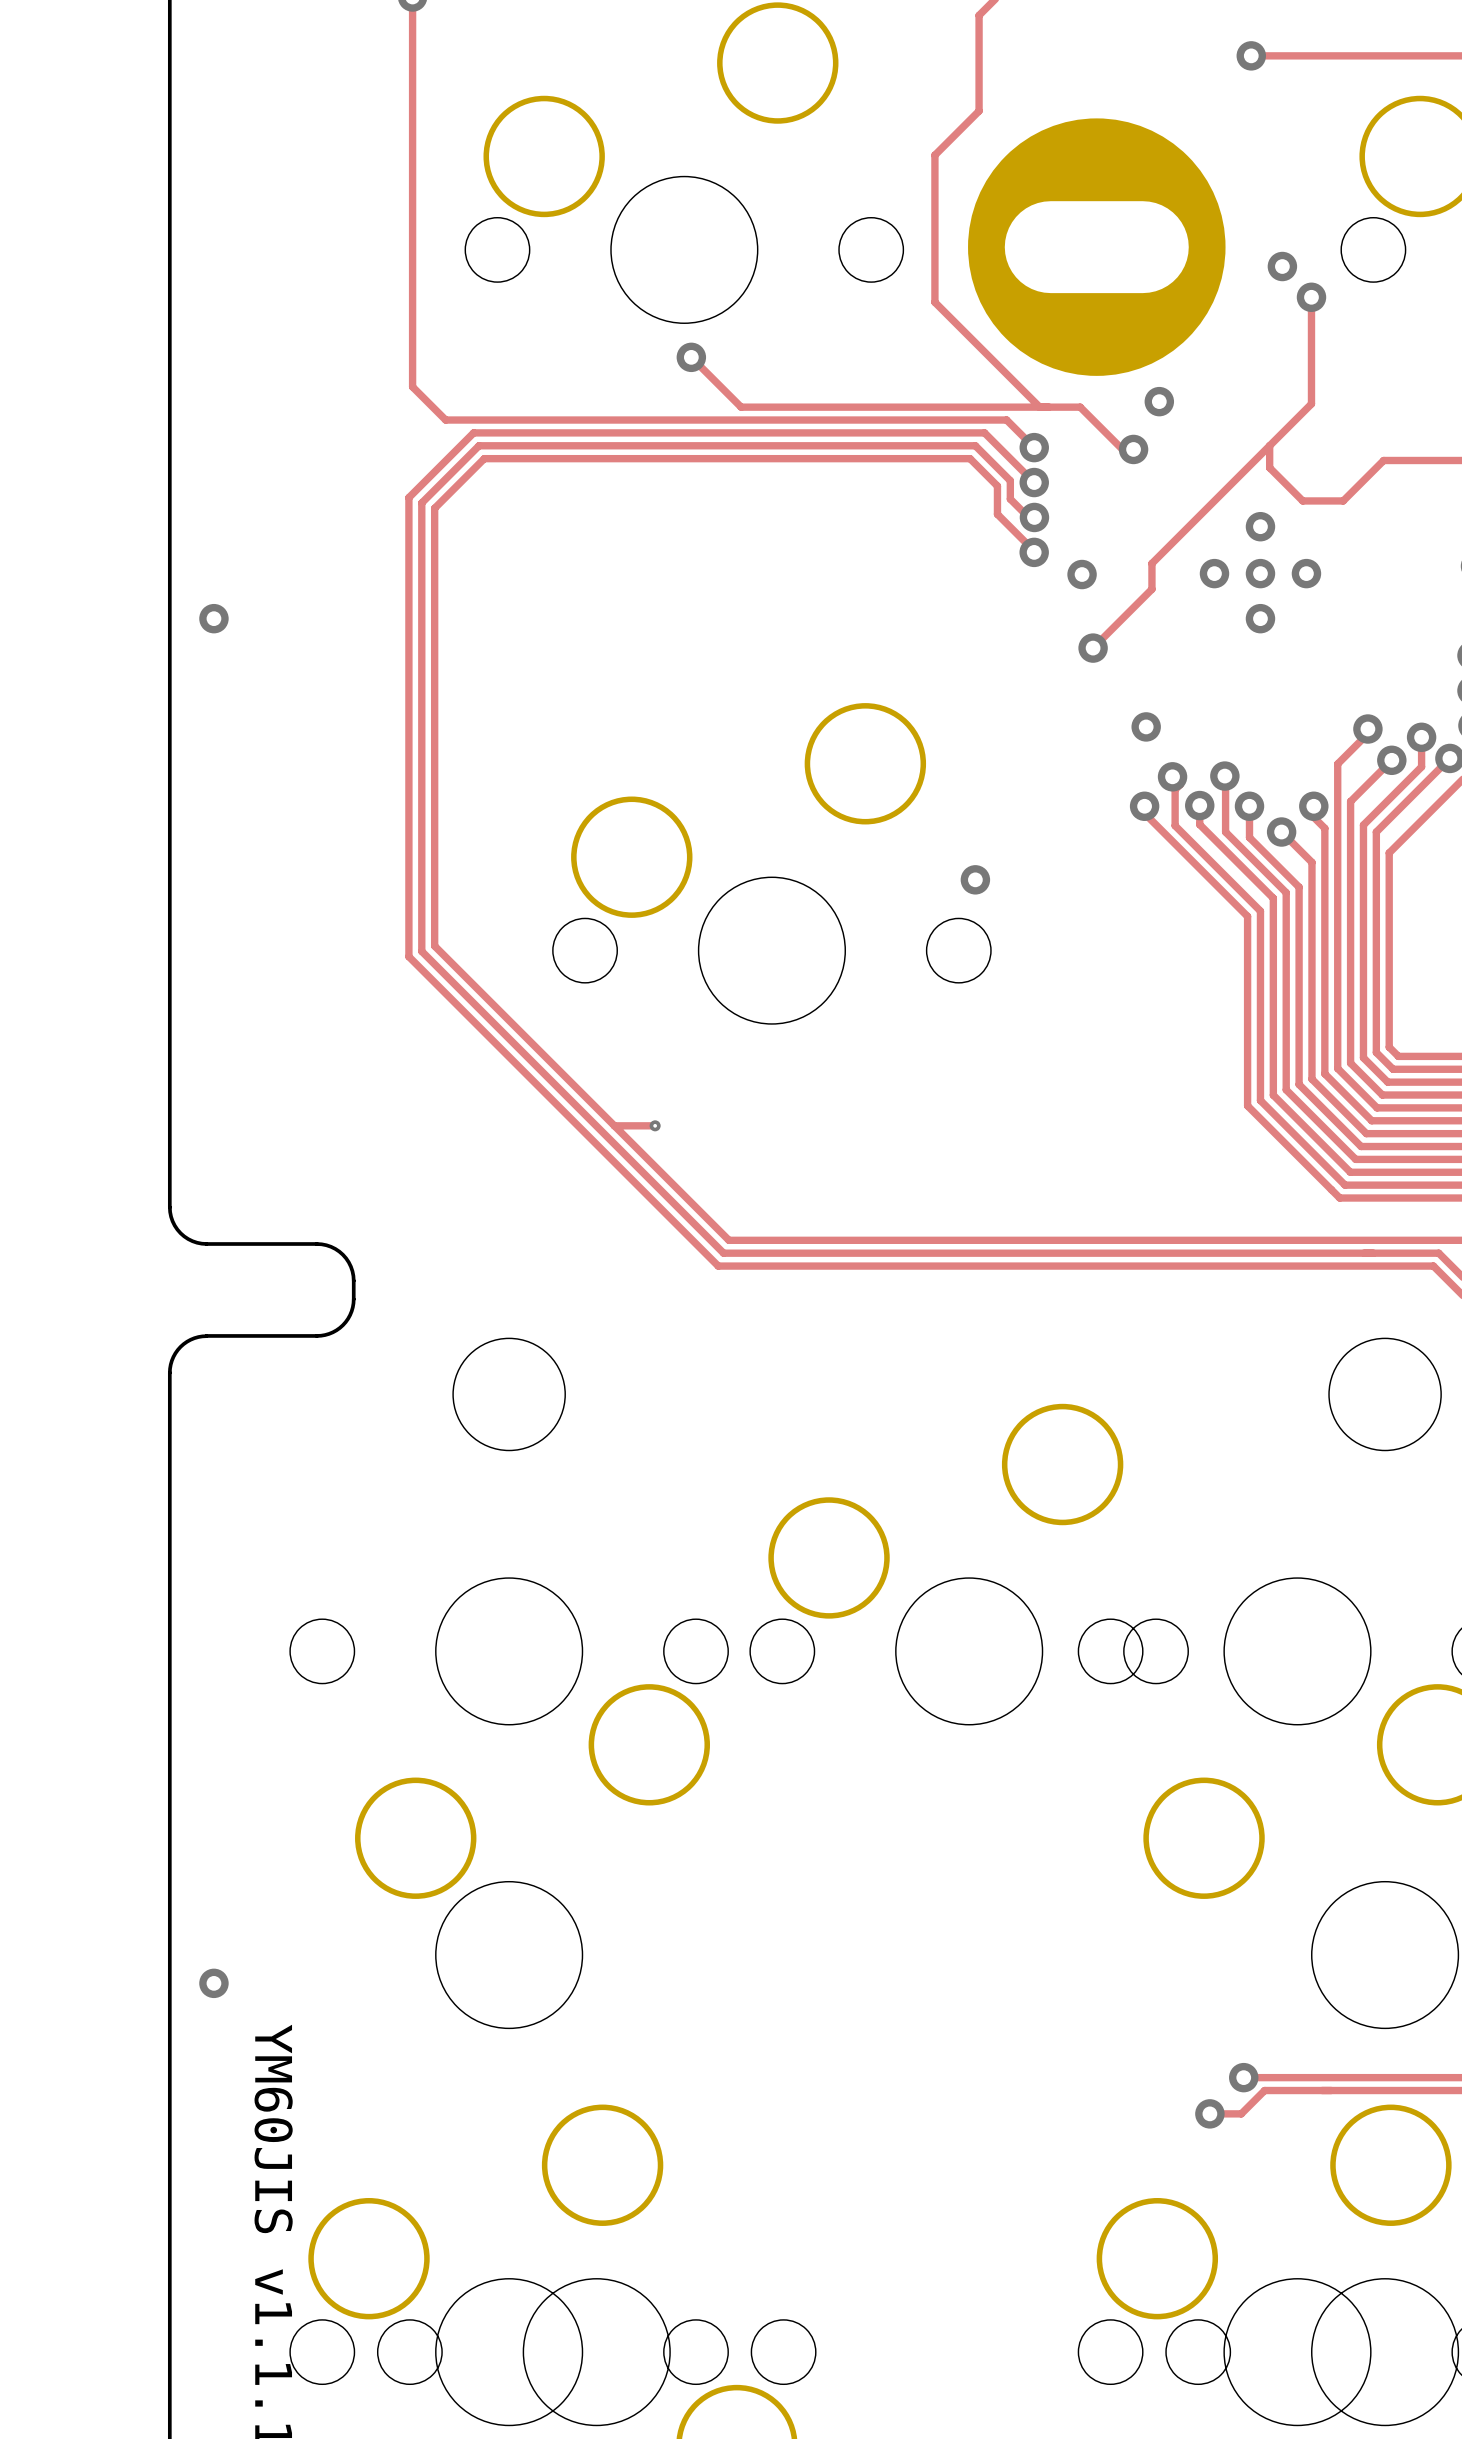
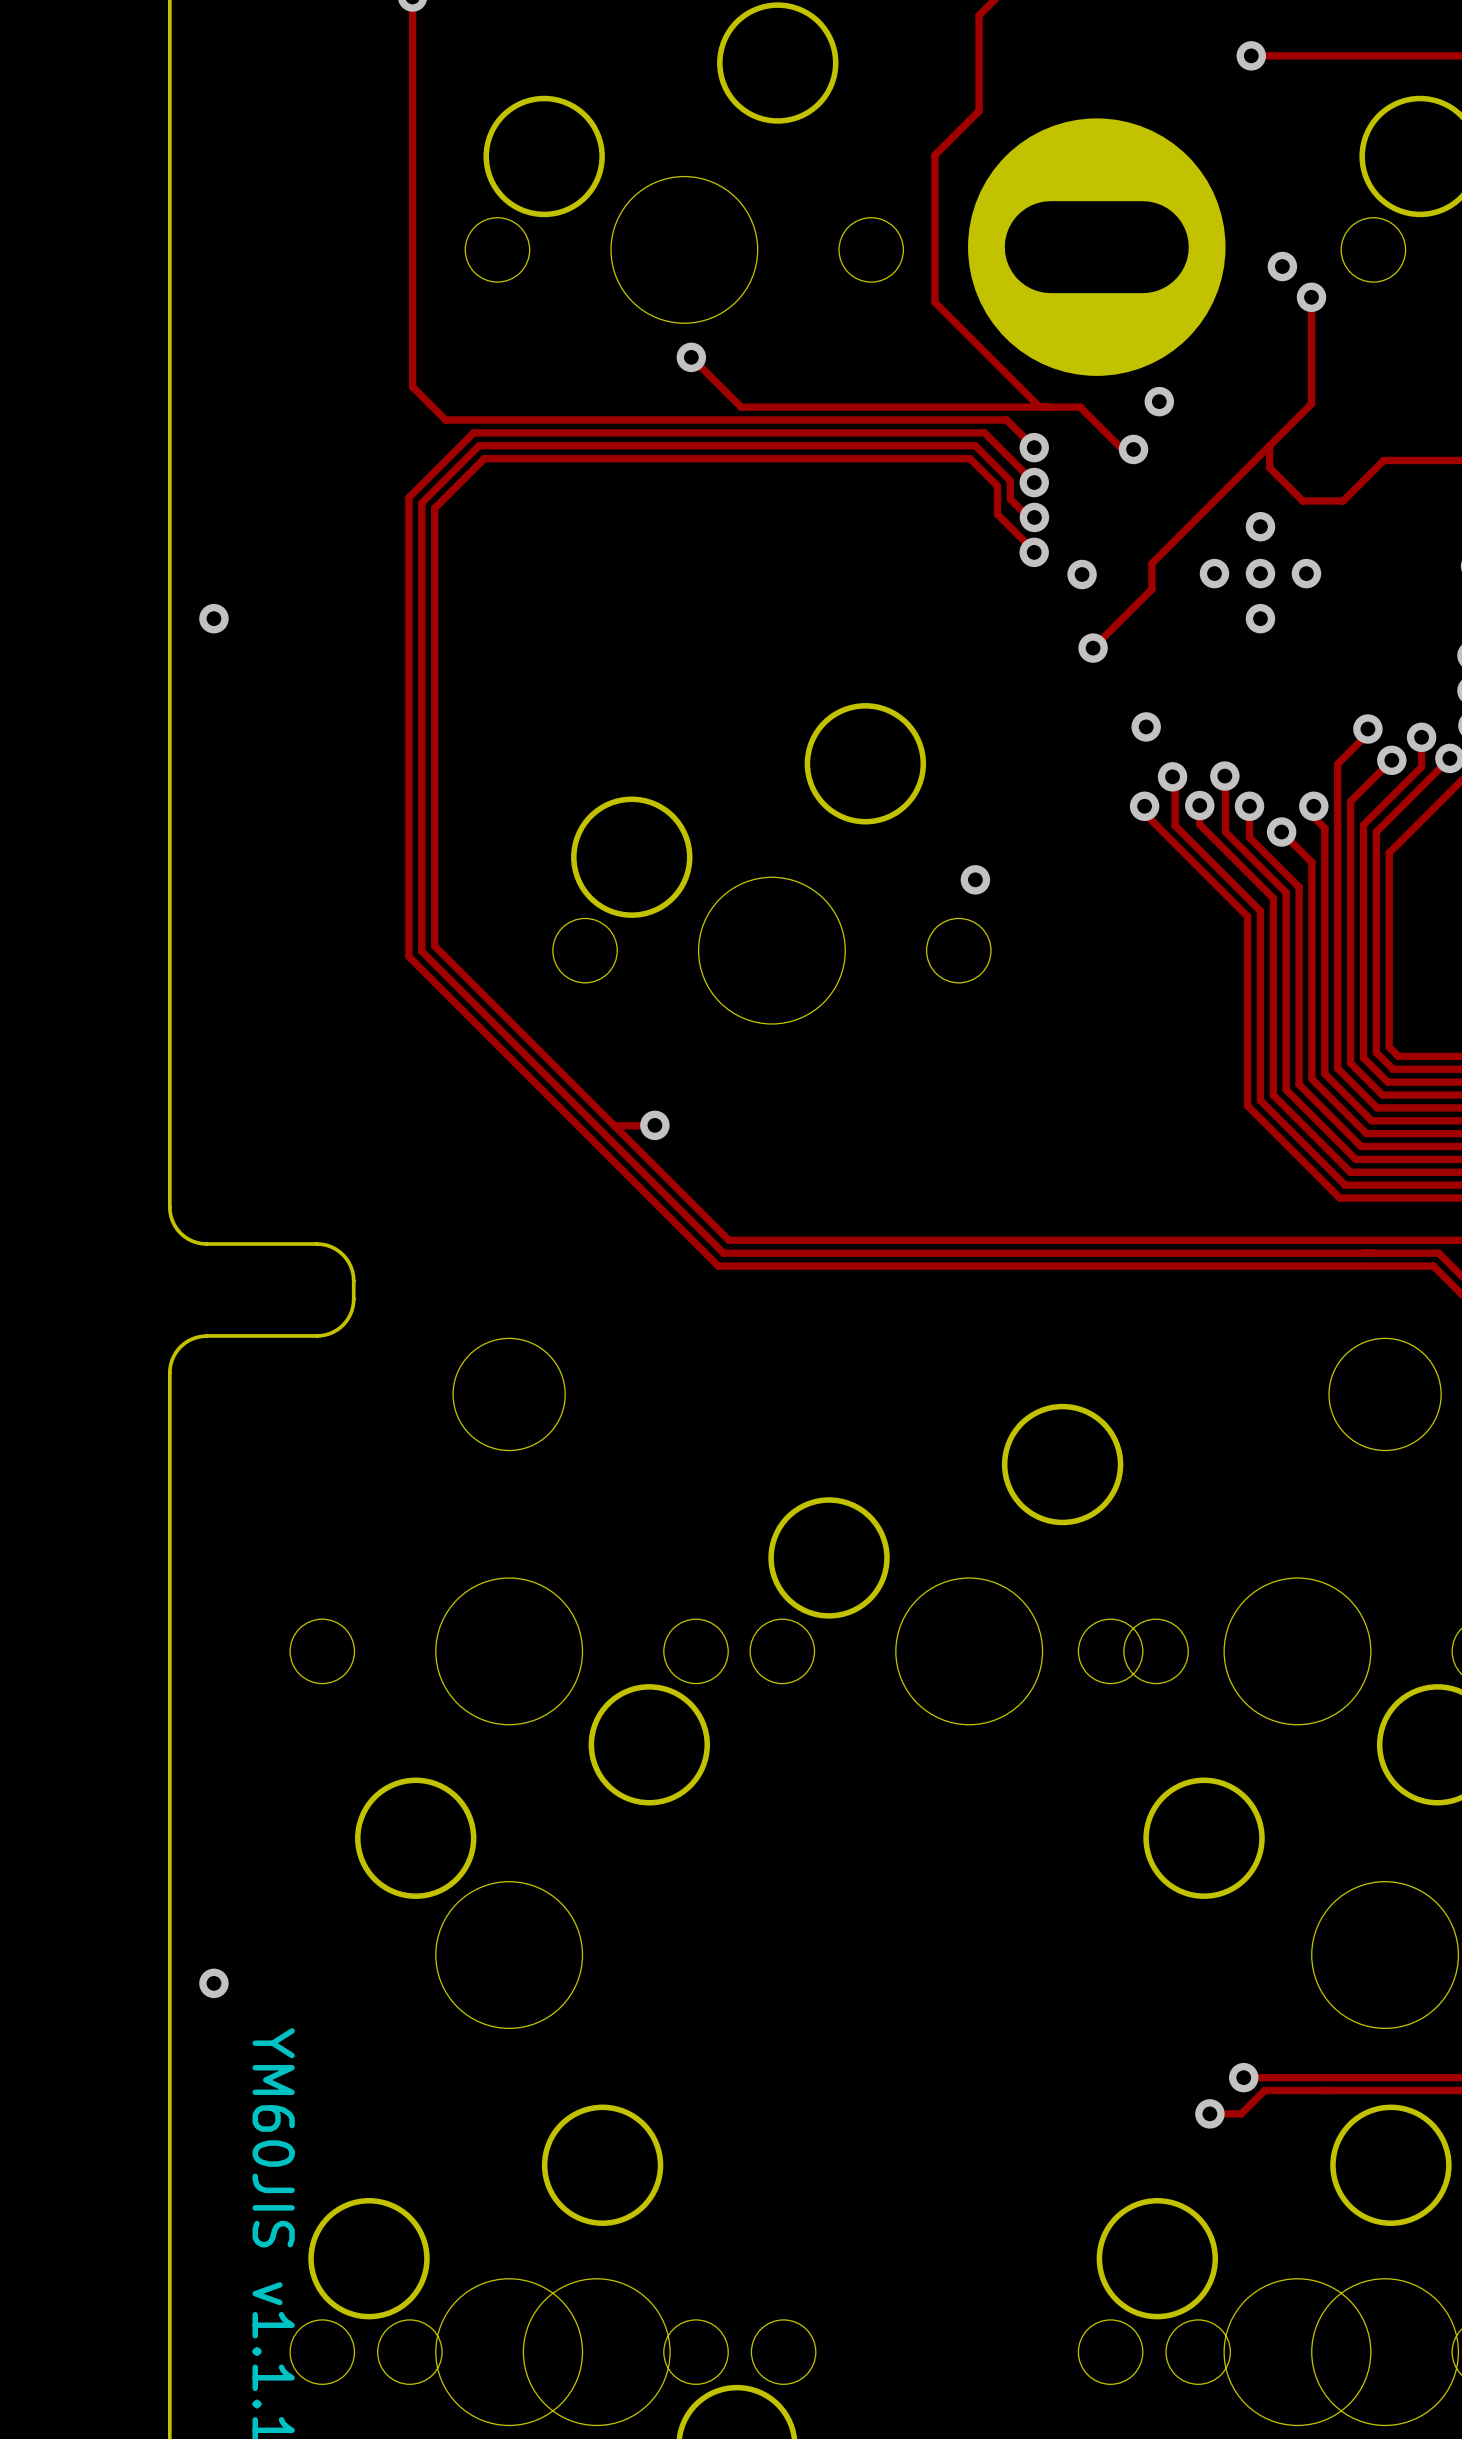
via size: [649, 1120, 661, 1132] -> [640, 1110, 670, 1141]

